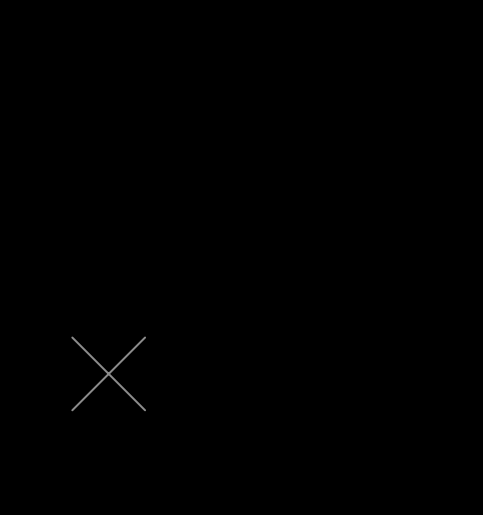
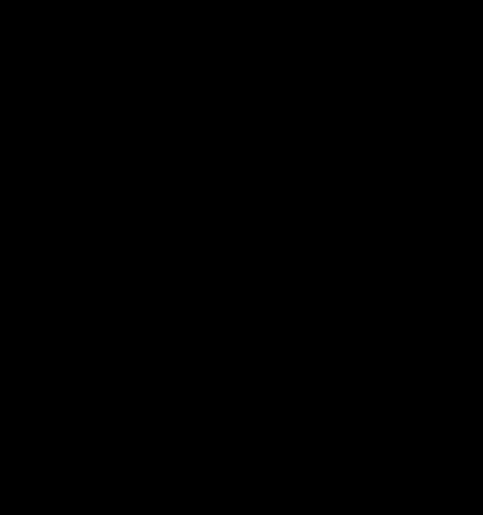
no-connect mark: (108, 373) -> none

